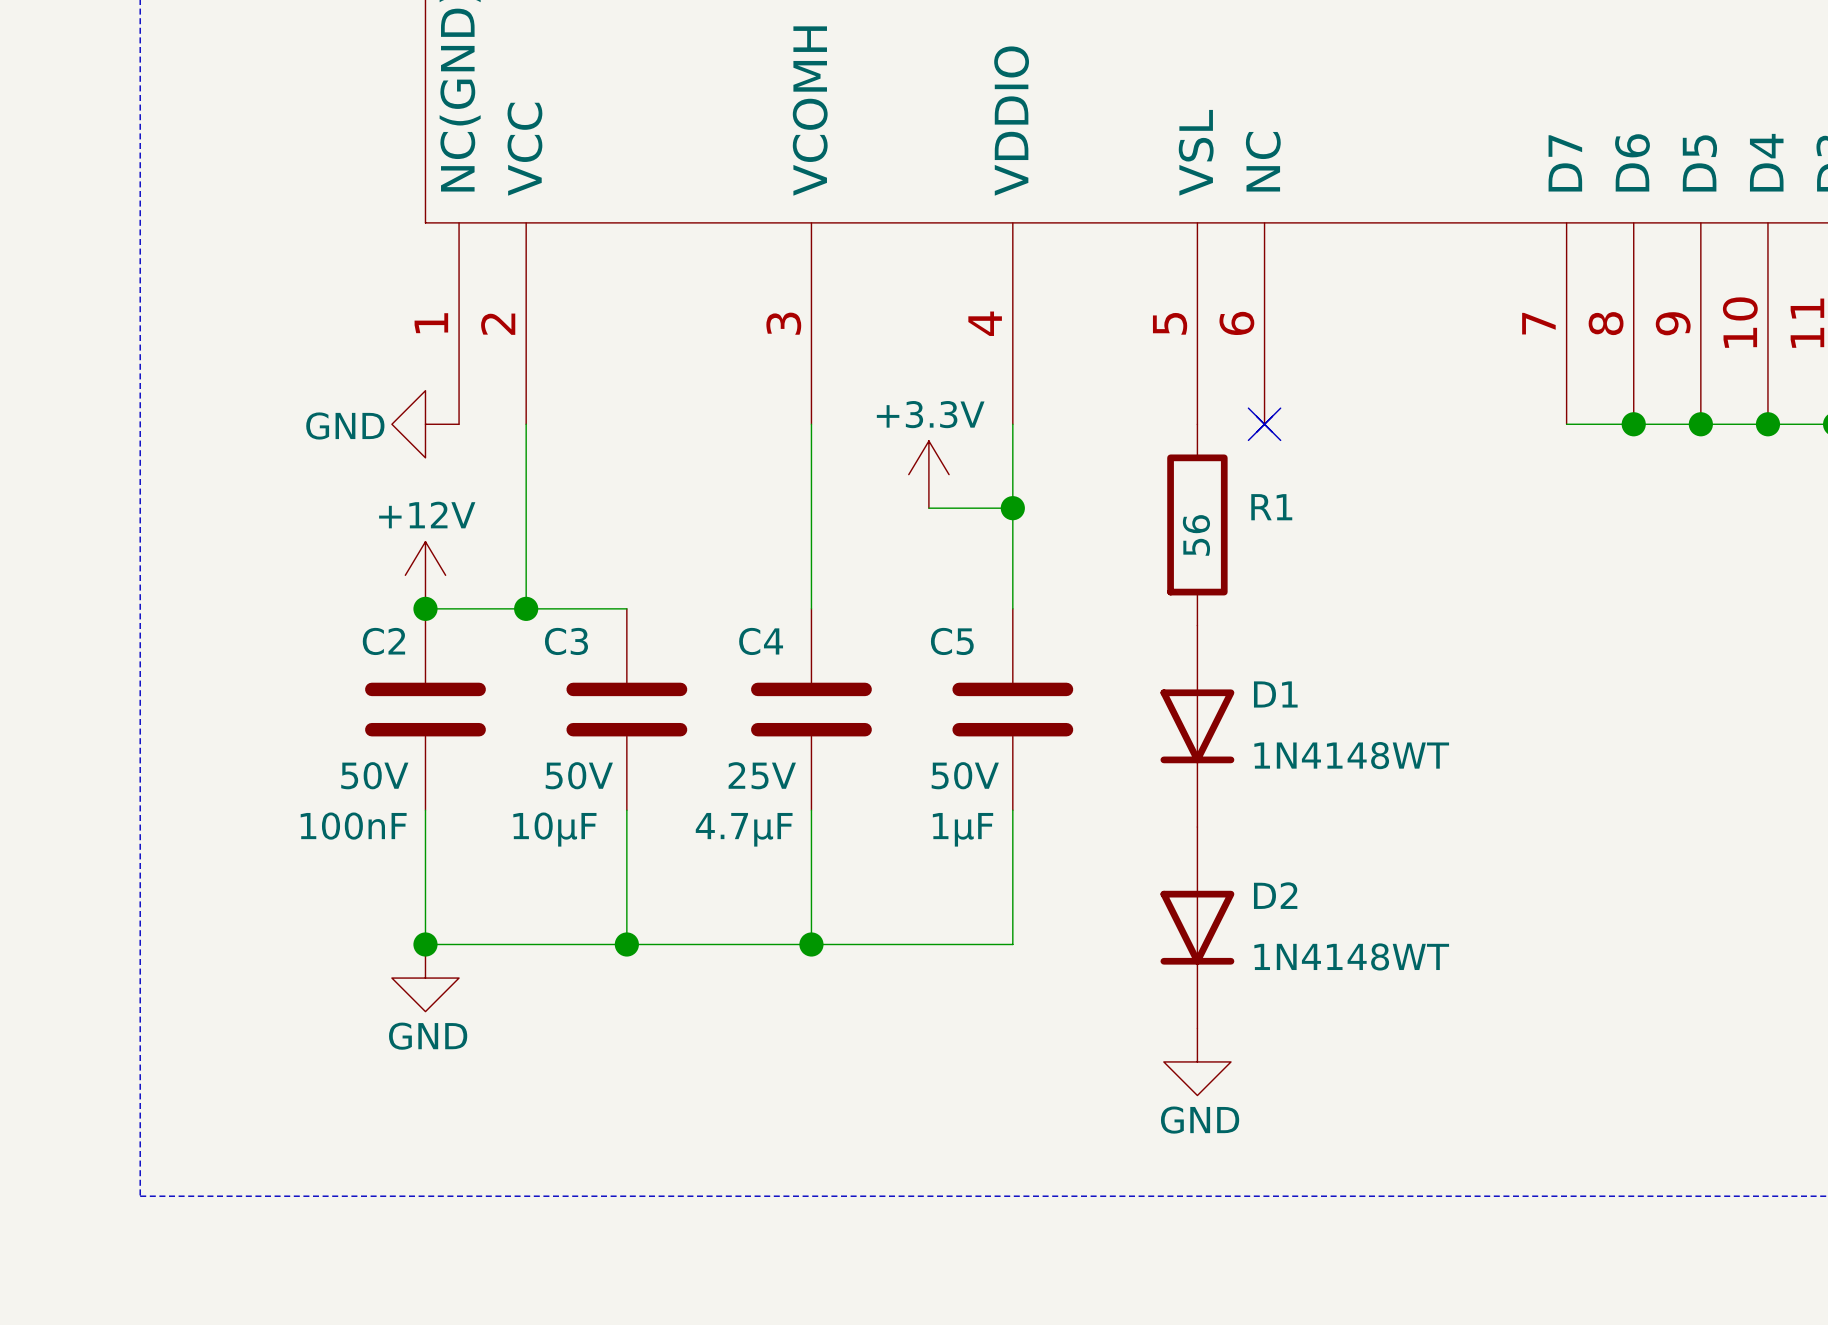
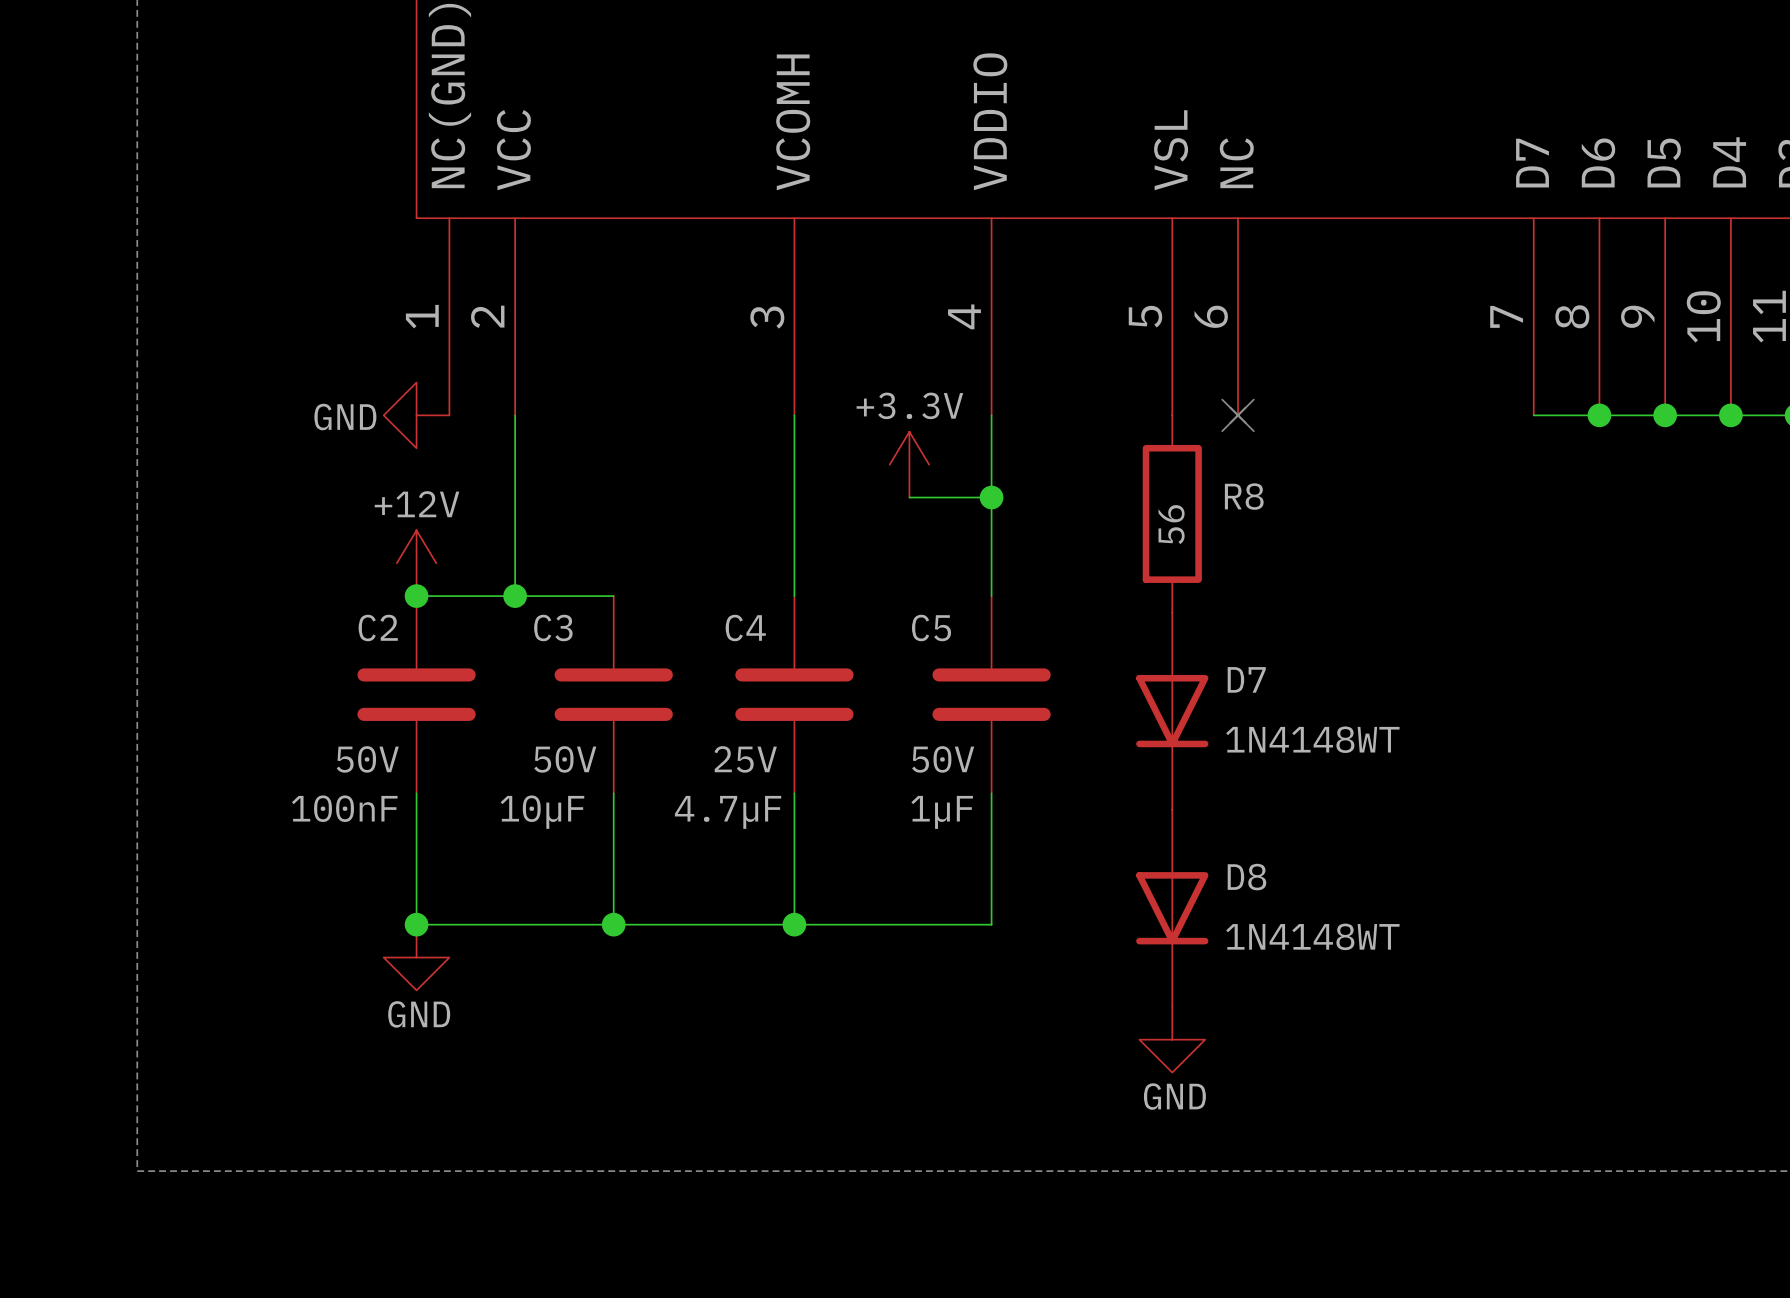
R1 name: R1 (1271, 507) -> R8 (1244, 496)
D1 name: D1 (1275, 694) -> D7 (1246, 679)
D2 name: D2 (1275, 895) -> D8 (1246, 877)

